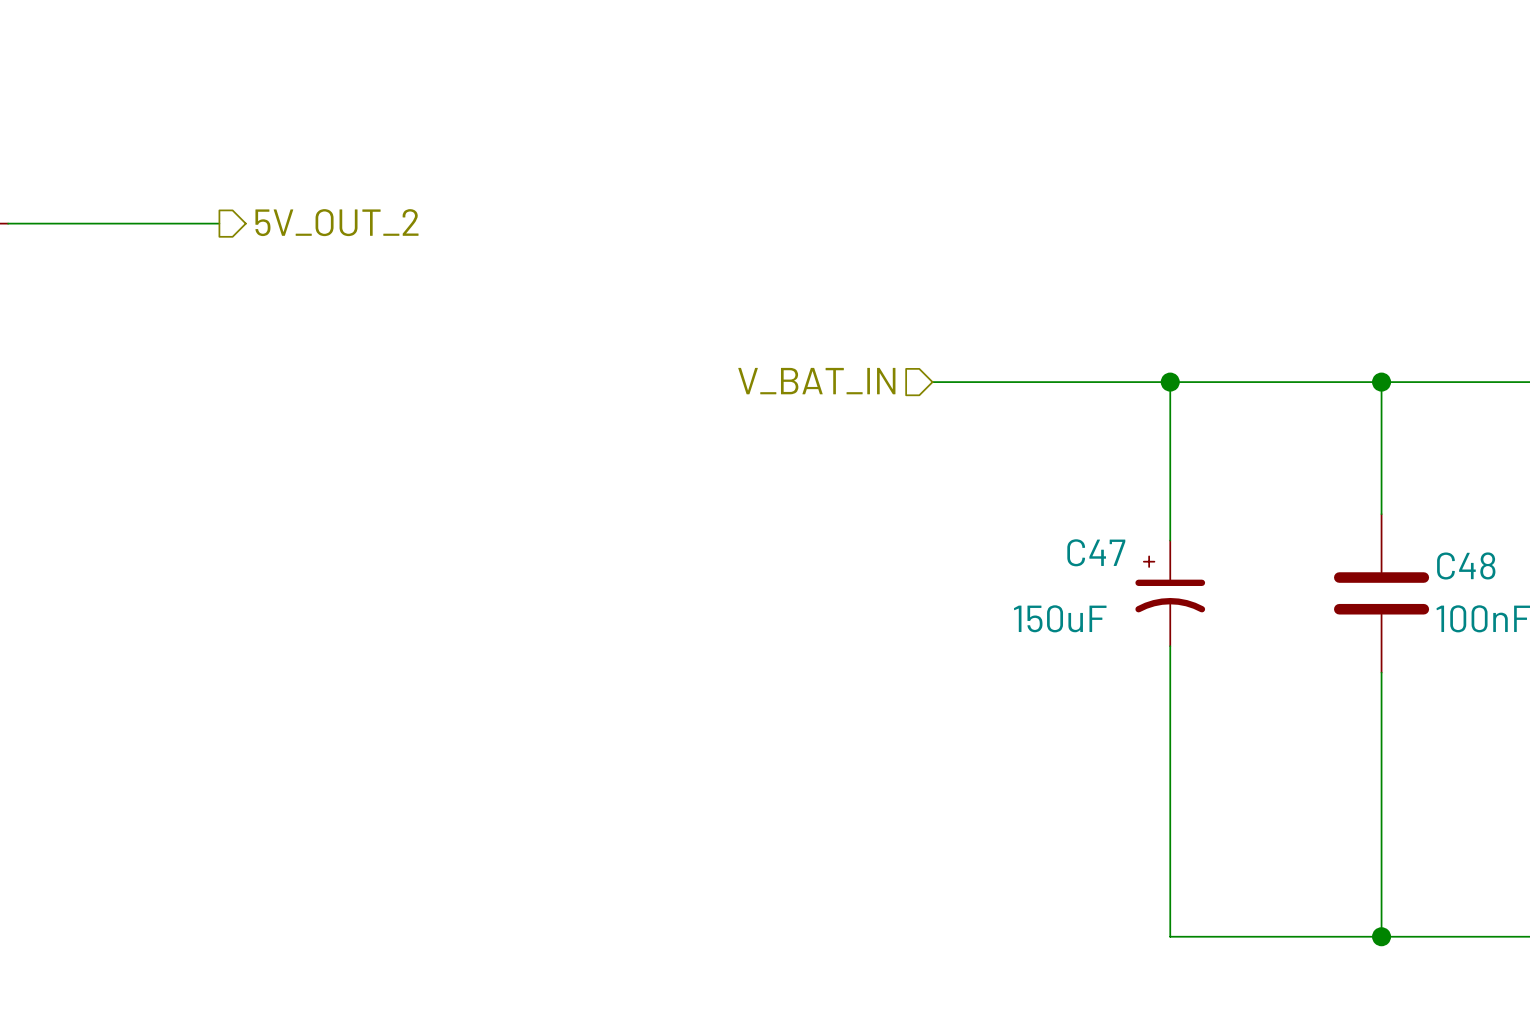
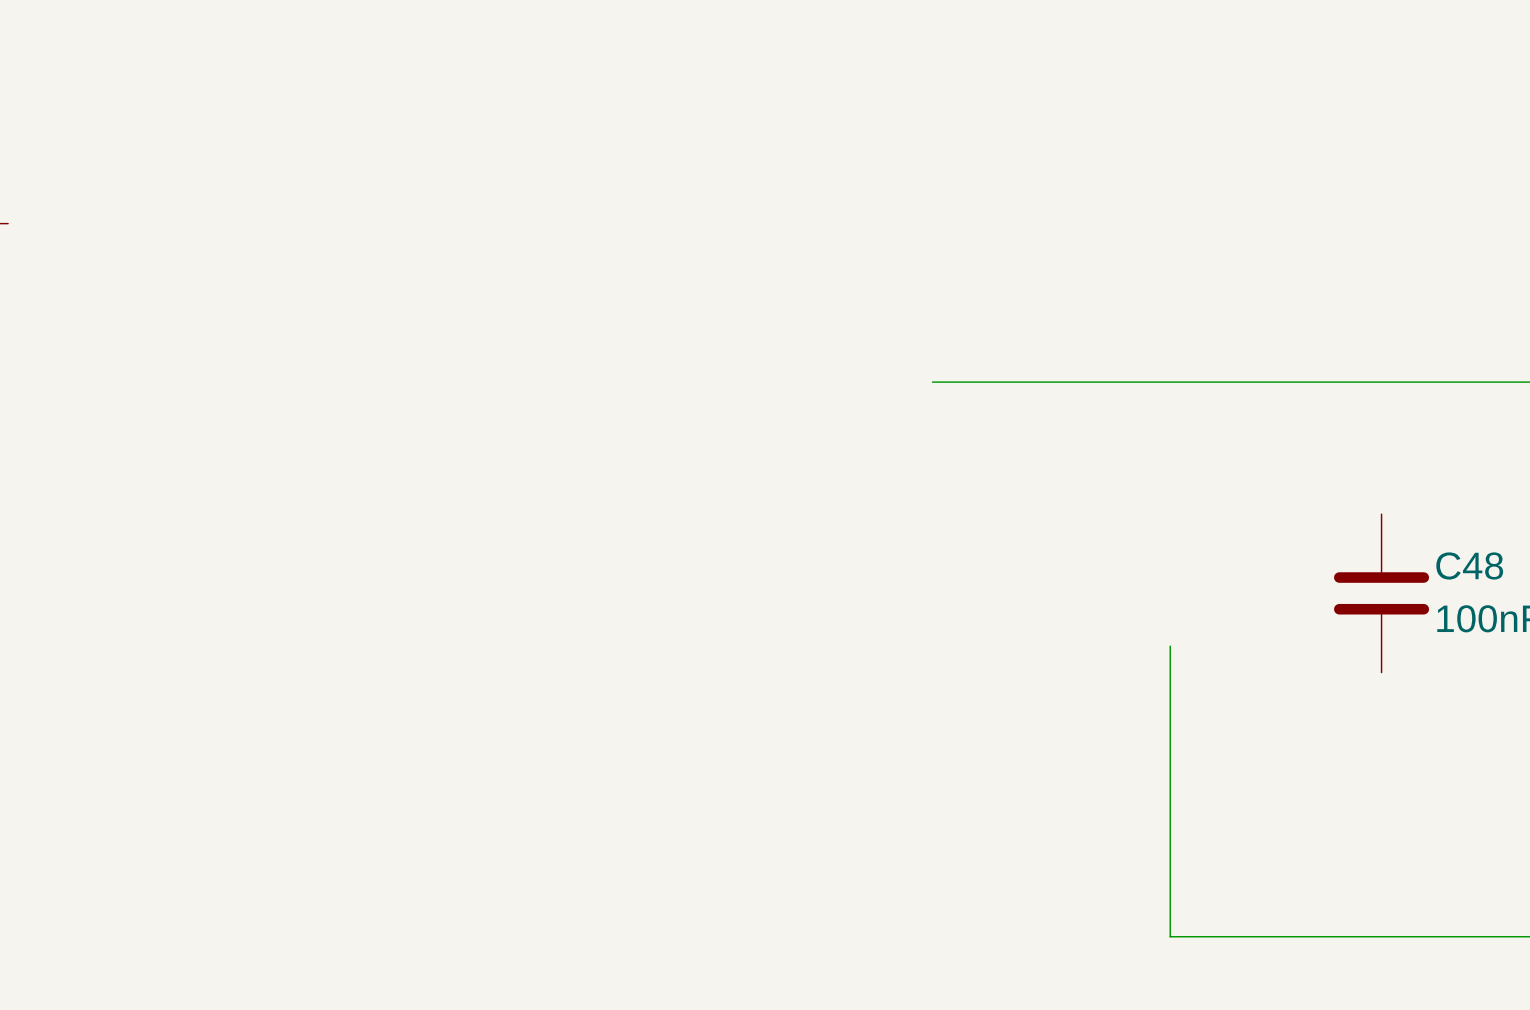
hierarchical label: 5V_OUT_2 (336, 222) -> none
wire: (8, 223) (219, 223) -> none
hierarchical label: V_BAT_IN (816, 381) -> none
wire: (1170, 382) (1170, 540) -> none
junction: (1170, 382) -> none
wire: (1381, 382) (1381, 514) -> none
junction: (1381, 382) -> none
C47: 150uF (1170, 593) -> none
wire: (1381, 672) (1381, 936) -> none
junction: (1381, 936) -> none

